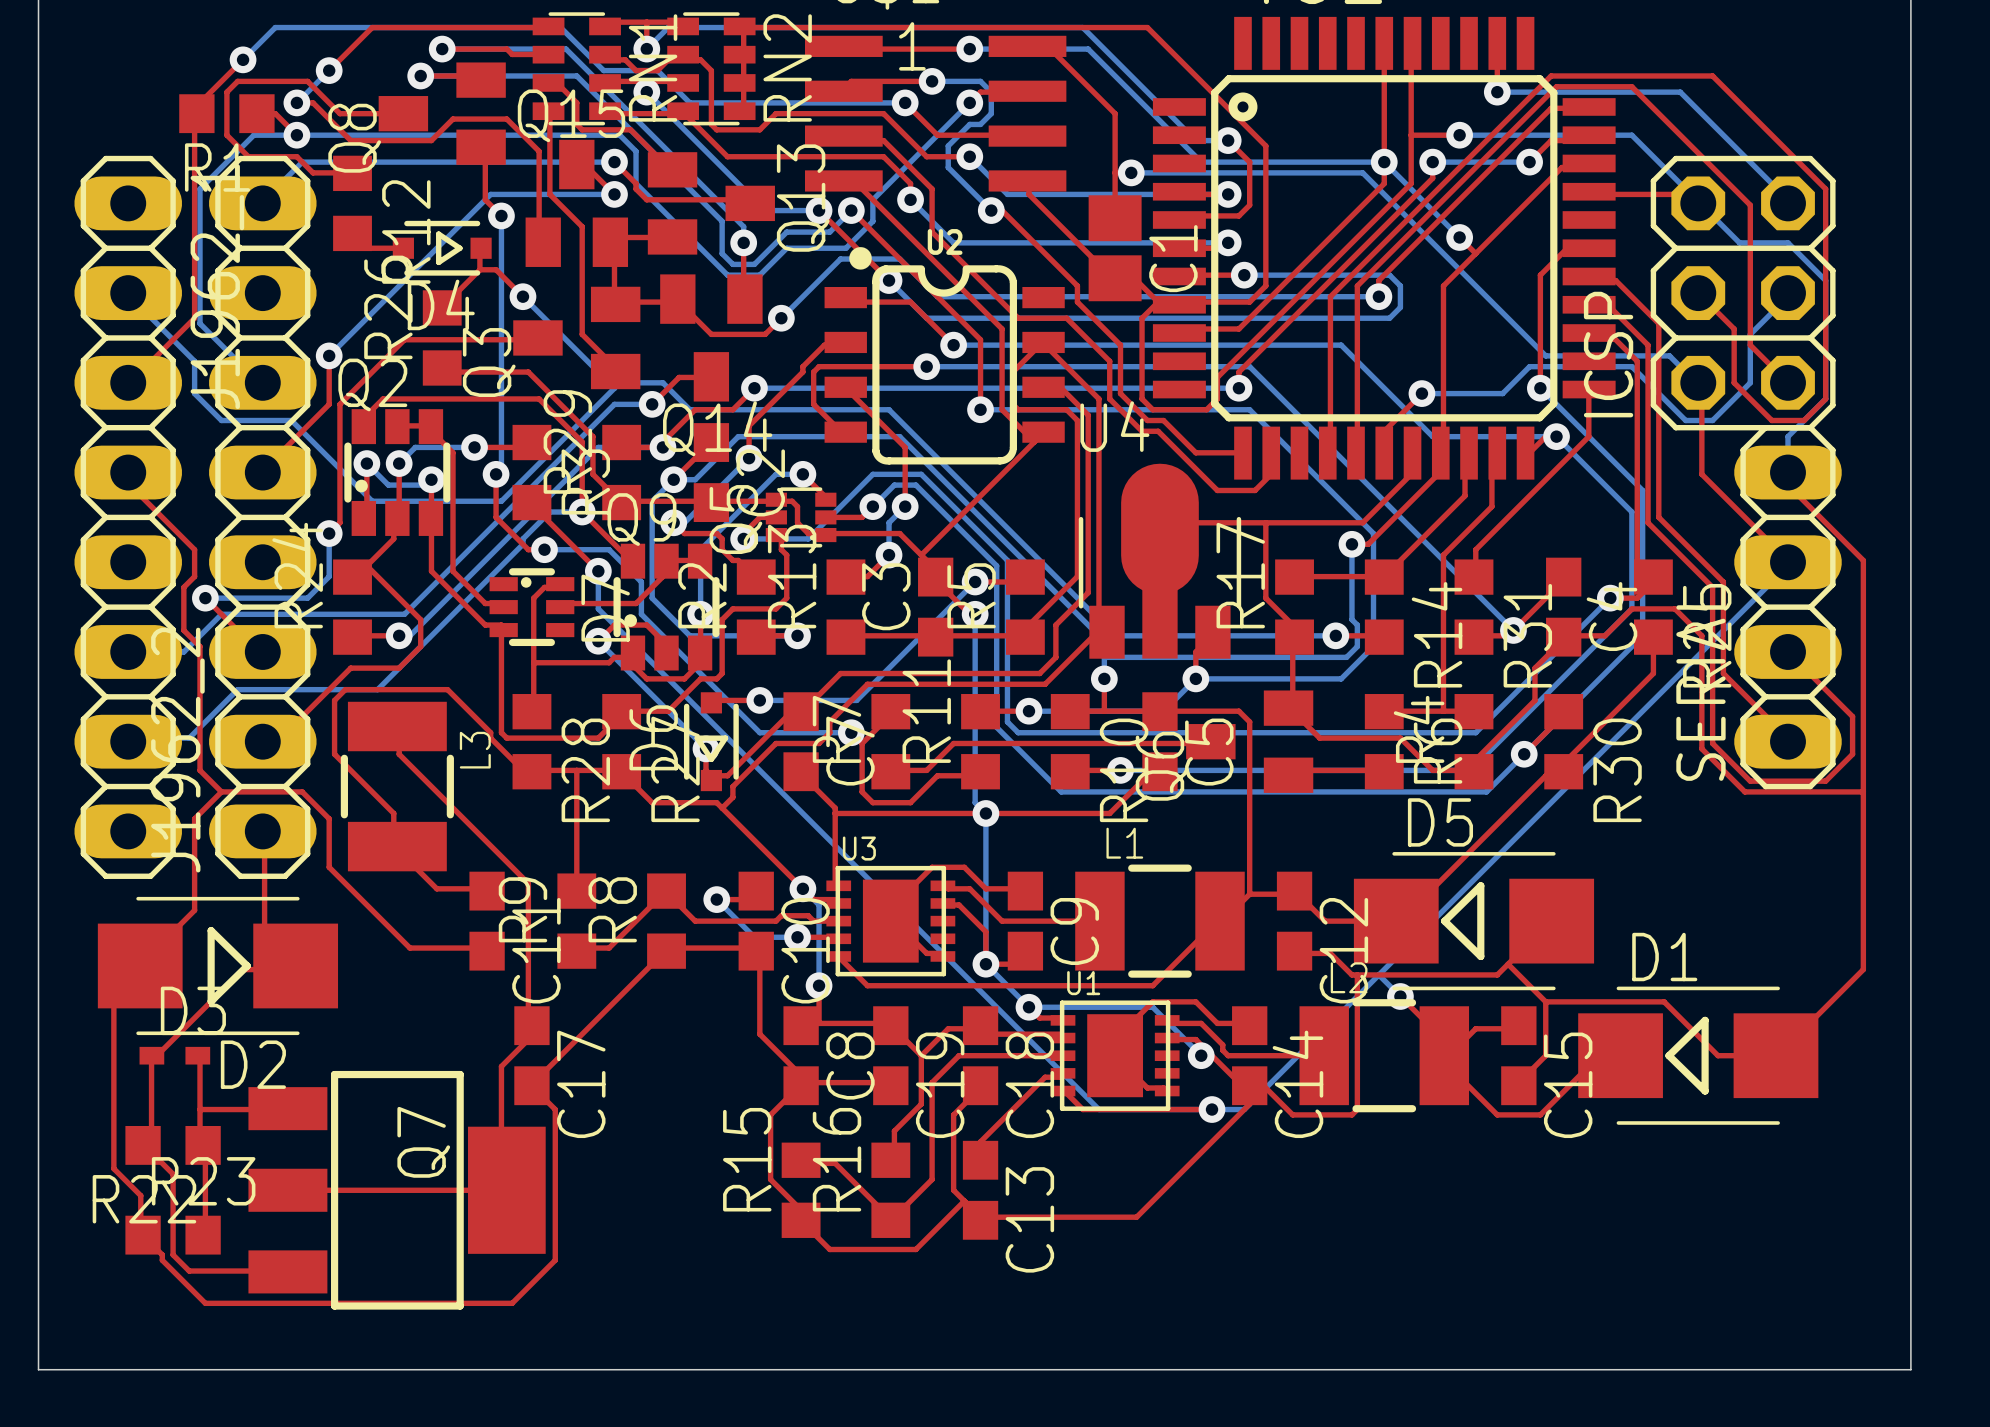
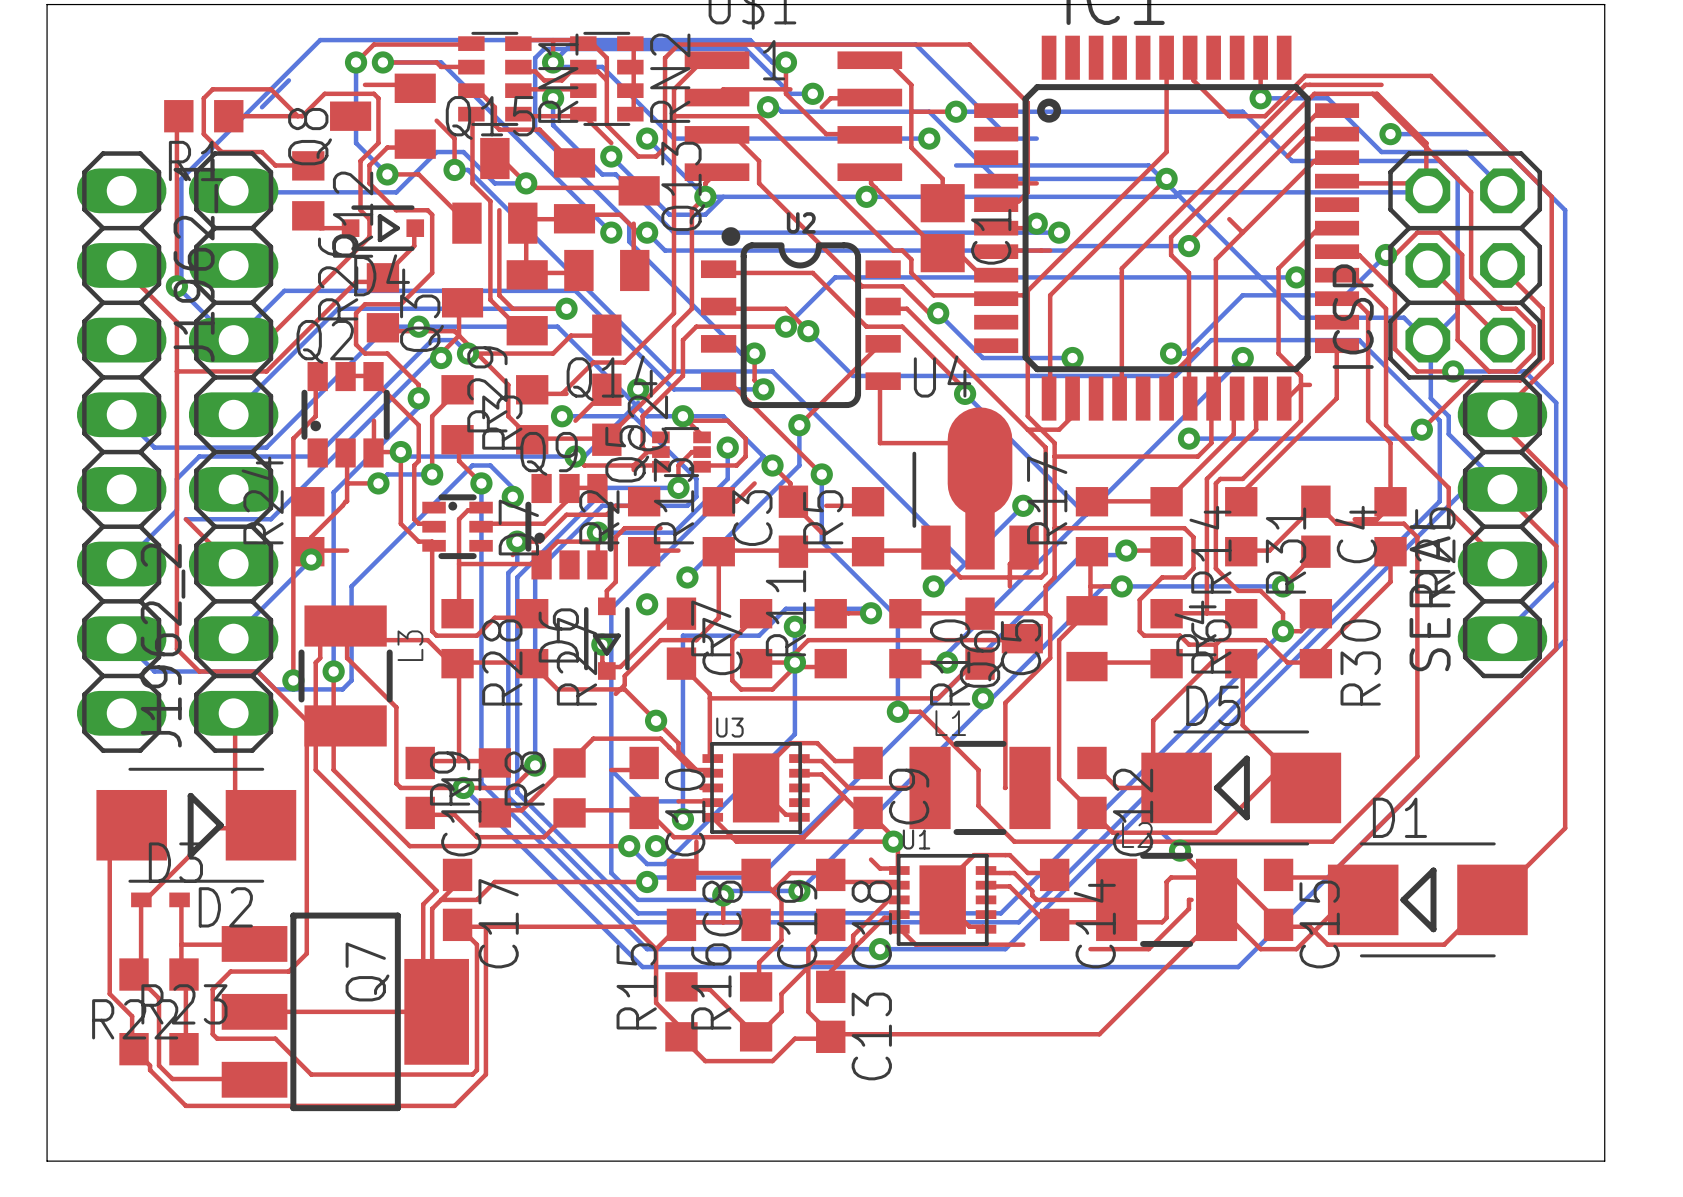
top track: none -> (583, 43) (593, 44) (606, 57) (606, 80)
top track: (431, 27) (372, 27) (329, 70) -> (373, 44) (356, 62)
top track: (743, 27) (797, 27) -> (911, 111) (956, 111)
top track: (1412, 43) (1411, 183) (1217, 377) -> (1027, 290) (1027, 335)
top track: (843, 46) (845, 49) (969, 49) -> (717, 60) (714, 62) (700, 62) (674, 89) (674, 313) (642, 344)
bottom track: none -> (356, 62) (356, 143) (387, 174)
bottom track: (512, 49) (566, 49) (743, 226) (743, 242) -> (441, 62) (611, 232)
via: none -> (785, 62)
bottom track: (969, 49) (1088, 49) (1201, 162) (1384, 162) (1459, 237) -> none
via: (969, 49) -> none
bottom track: none -> (553, 66) (602, 66) (674, 138) (929, 138)
top track: (243, 59) (200, 102) (200, 113) (196, 113) -> none
bottom track: (243, 59) (275, 27) (560, 27) (603, 70) (657, 70) (689, 102) (905, 102) -> none
via: (243, 59) -> none
via: (329, 70) -> none
bottom track: (420, 75) (576, 75) (722, 221) (722, 253) (732, 264) (754, 264) (786, 232) -> none
via position: (420, 75) -> (356, 62)
top track: (1077, 75) (1115, 113) (1115, 189) -> (911, 84) (911, 147) (942, 178)
top track: (1642, 75) (1712, 75) -> (1190, 57) (1193, 57) (1193, 80) (1229, 116) (1265, 116) (1305, 75) (1430, 75) (1439, 84)
bottom track: (932, 81) (980, 81) (991, 92) (991, 113) (980, 124) (969, 124) (948, 145) (948, 167) (991, 210) -> none
via: (932, 81) -> none
bottom track: none -> (553, 93) (553, 125) (602, 174) (615, 174) (674, 232) (1059, 232)
bottom track: none -> (812, 93) (790, 93) (745, 49) (544, 49) (535, 57) (535, 129) (629, 223) (629, 241) (741, 353) (754, 353)
top track: (1561, 86) (1556, 86) (1357, 285) (1357, 431) -> (1314, 93) (1171, 237) (1171, 255) (1188, 272) (1190, 398)
top track: none -> (1372, 93) (1377, 93) (1426, 143) (1426, 187)
bottom track: (646, 92) (716, 162) -> none
bottom track: none -> (768, 98) (781, 111) (929, 111) (996, 178) (1166, 178)
bottom track: (1578, 92) (1680, 92) (1744, 156) -> (1327, 98) (1381, 152) (1466, 152)
top track: (1217, 97) (1265, 145) (1265, 285) (1249, 302) (1179, 302) (1179, 304) (1158, 302) (1142, 318) (1142, 398) (1152, 409) (1206, 409) (1217, 398) -> (1045, 613) (1045, 586) (1054, 577) (1054, 443) (1027, 416) (1027, 353)
top track: (296, 102) (313, 102) (350, 140) (431, 140) (453, 119) (506, 119) -> none
via: (296, 102) -> none
top track: (905, 102) (937, 135) (975, 135) -> (785, 62) (785, 93) (826, 134)
bottom track: (969, 102) (872, 199) (872, 221) (845, 248) (786, 248) (759, 275) (727, 275) (636, 183) (636, 151) (619, 135) (253, 135) -> (785, 62) (772, 62) (750, 40) (320, 40) (226, 134)
via position: (969, 102) -> (812, 93)
bottom track: none -> (956, 111) (1242, 111) (1291, 160) (1439, 160) (1457, 178) (1457, 313) (1430, 340) (1430, 398) (1448, 416) (1448, 434) (1502, 487) (1484, 469) (1005, 949) (647, 949) (481, 783) (481, 483)
via: none -> (956, 111)
top track: (1567, 108) (1551, 108) (1378, 280) (1378, 296) -> (1318, 111) (1188, 241) (1188, 246)
top track: (275, 113) (296, 135) -> (244, 116) (297, 116)
top track: (345, 113) (399, 113) -> (302, 116) (324, 93) (373, 93) (378, 98) (378, 143) (360, 160) (360, 210) (369, 219) (369, 237) (266, 340) (233, 340)
top track: (792, 113) (775, 113) (759, 129) (716, 129) -> (678, 44) (665, 57) (665, 147) (656, 156) (638, 156) (611, 129)
top track: (883, 113) (926, 156) (969, 156) -> none
via: (296, 135) -> none
top track: (1411, 135) (1459, 135) -> none
bottom track: (1459, 135) (1631, 135) (1739, 242) (1787, 242) (1825, 280) (1825, 398) (1787, 436) (1787, 472) -> none
via: (1459, 135) -> none
bottom track: none -> (1390, 134) (1489, 134) (1565, 210) (1565, 640) (1238, 967) (642, 967) (463, 787)
via: none -> (1390, 134)
top track: (528, 140) (539, 151) (539, 237) -> (454, 138) (454, 169)
bottom track: none -> (647, 138) (705, 196) (1175, 196) (1180, 192) (1427, 190)
via: none -> (647, 138)
top track: (867, 140) (883, 140) (932, 189) (932, 232) -> (759, 160) (759, 183) (790, 214)
via: none -> (929, 138)
top track: (1228, 140) (1249, 162) (1249, 205) (1238, 215) (1206, 215) -> (1027, 102) (1027, 192) (1018, 201)
via: (1228, 140) -> none
top track: (716, 145) (727, 156) (883, 156) -> (736, 138) (750, 152)
top track: (481, 147) (485, 151) (485, 199) (501, 215) -> (415, 144) (414, 147) (387, 147) (369, 165) (369, 183) (396, 210) (427, 210) (432, 214) (432, 272) (400, 304)
bottom track: (969, 156) (1007, 194) (1228, 194) -> none
via: (969, 156) -> none
top track: (1384, 156) (1384, 183) (1238, 328) (1212, 328) -> (1166, 152) (1023, 295)
top track: (614, 162) (636, 183) (636, 189) (646, 199) -> (526, 183) (530, 187) (553, 187)
bottom track: (614, 162) (302, 162) (262, 203) -> (494, 183) (463, 152) (436, 152) (396, 192) (233, 190)
via: (614, 162) -> none
via: none -> (611, 156)
via position: (1384, 162) -> (1166, 178)
top track: (1432, 162) (1432, 178) (1238, 372) (1238, 388) -> none
bottom track: (1432, 162) (1529, 162) -> none
via: (1432, 162) -> none
via: (1529, 162) -> none
top track: (894, 167) (910, 183) (910, 199) -> none
via: (1131, 172) -> none
bottom track: none -> (454, 169) (468, 169) (669, 371) (772, 371) (965, 564)
via: none -> (454, 169)
top track: (843, 180) (845, 183) (856, 183) (1002, 328) (1002, 409) (1034, 442) (1043, 432) -> (717, 172) (705, 183) (705, 196) (691, 210) (691, 308) (674, 326) (674, 371) (606, 438)
top track: none -> (387, 174) (418, 174) (463, 219)
via: none -> (387, 174)
top track: (1825, 189) (1825, 366) -> (1533, 178) (1551, 196) (1551, 362) (1502, 411) (1502, 414)
bottom track: (576, 194) (490, 194) (329, 355) -> none
via: (1228, 194) -> none
bottom track: (910, 199) (953, 242) (1228, 242) -> none
via: (910, 199) -> none
bottom track: (765, 210) (819, 210) -> (651, 196) (669, 214)
top track: (819, 210) (889, 280) -> none
via: (819, 210) -> none
via: none -> (705, 196)
top track: (851, 210) (980, 339) (980, 409) -> none
via: (851, 210) -> none
top track: (991, 210) (1002, 210) (1066, 275) -> (750, 116) (759, 116) (893, 250) (902, 250)
via position: (991, 210) -> (866, 196)
bottom track: (501, 215) (501, 468) (496, 474) -> none
via: (501, 215) -> none
top track: (571, 215) (582, 226) -> (490, 201) (490, 299) (517, 326) (526, 326)
top track: none -> (574, 218) (575, 214) (620, 214) (638, 232) (647, 232)
via: (1459, 237) -> none
via position: (743, 242) -> (647, 232)
via: none -> (611, 232)
bottom track: none -> (647, 232) (665, 250) (1050, 250)
top track: (479, 269) (496, 269) (522, 296) -> none
via: none -> (1188, 246)
via position: (1244, 275) -> (1059, 232)
bottom track: (1265, 275) (1389, 275) (1400, 285) (1400, 307) (1389, 318) (926, 318) (889, 280) -> (1068, 250) (1072, 246) (1188, 246)
top track: (1540, 275) (1540, 388) -> (1296, 250) (1278, 268) (1278, 353) (1300, 375) (1300, 420)
via: (889, 280) -> none
top track: none -> (1386, 255) (1394, 255) (1417, 232) (1439, 232) (1462, 255) (1462, 299) (1471, 308)
bottom track: none -> (1386, 255) (1345, 295) (1242, 295) (1184, 353) (1171, 353)
via: none -> (1386, 255)
bottom track: (128, 293) (194, 361) (194, 393) (221, 420) (291, 420) (372, 501) (501, 501) (619, 382) (662, 382) (689, 409) (889, 409) (1115, 635) (1335, 635) -> none
top track: none -> (1502, 265) (1502, 268) (1542, 308) (1542, 358) (1520, 380) (1471, 380) (1421, 429)
bottom track: (1787, 293) (1787, 296) (1750, 334) (1750, 382) (1712, 420) (1685, 420) (1631, 366) (1529, 366) (1502, 393) (1421, 393) -> none
bottom track: (522, 296) (614, 388) -> none
via: (522, 296) -> none
bottom track: (1378, 296) (937, 296) (899, 259) (840, 259) (781, 318) -> none
via: (1378, 296) -> none
top track: (677, 299) (711, 334) (765, 334) (781, 318) -> none
top track: (910, 302) (953, 345) -> (772, 272) (812, 272) (866, 326) (902, 326)
top track: none -> (382, 277) (382, 281) (356, 281) (266, 371) (176, 371)
bottom track: none -> (1296, 277) (835, 277) (785, 326) (777, 326)
via: none -> (1296, 277)
top track: (1750, 307) (1750, 345) -> (1471, 277) (1502, 308) (1515, 308) (1533, 326)
top track: (194, 318) (128, 382) -> none
via: none -> (176, 286)
via: (781, 318) -> none
top track: (582, 328) (582, 334) (614, 366) -> (499, 295) (512, 308) (566, 308)
top track: (1104, 328) (1120, 345) (1120, 393) -> (933, 295) (991, 295) (996, 298)
top track: (420, 339) (404, 339) (339, 404) (339, 522) (329, 533) -> none
top track: (463, 339) (533, 339) -> (441, 358) (441, 353) (459, 335) (459, 304)
top track: (845, 342) (840, 345) (824, 345) (802, 366) (802, 372) (749, 425) (749, 458) -> (718, 306) (718, 308) (785, 308) (808, 331)
top track: (1043, 342) (1012, 372) (1012, 404) (1018, 409) (1066, 409) (1077, 420) (1077, 576) (1028, 625) (1028, 635) -> none
bottom track: none -> (566, 308) (338, 308) (233, 414)
via: none -> (566, 308)
bottom track: (953, 345) (1341, 345) (1432, 436) (1556, 436) (1631, 512) (1631, 608) (1470, 770) (1120, 770) -> none
via: (953, 345) -> none
top track: (1045, 345) (1066, 366) -> (884, 308) (906, 308) (947, 349)
top track: (1098, 350) (1109, 361) (1109, 398) (1142, 431) (1158, 431) -> (969, 371) (978, 380)
bottom track: none -> (938, 313) (983, 358) (1072, 358)
via: none -> (938, 313)
top track: (1626, 350) (1637, 361) (1637, 560) (1653, 576) -> (1368, 313) (1368, 420) (1390, 443) (1390, 501)
top track: (329, 355) (329, 404) (262, 472) -> none
via: (329, 355) -> none
via: none -> (418, 326)
bottom track: (926, 366) (1249, 366) (1513, 630) -> none
top track: (813, 372) (813, 404) (840, 431) (845, 432) -> (691, 331) (682, 340) (682, 375) (642, 416) (642, 447) (647, 452)
bottom track: none -> (808, 331) (853, 375) (1175, 375) (1211, 340) (1359, 340) (1439, 420) (1439, 501) (1018, 922) (633, 922) (508, 796) (508, 572) (517, 564) (517, 541)
via: none -> (808, 331)
top track: (679, 377) (652, 404) -> (579, 335) (571, 335) (553, 353) (468, 353)
bottom track: none -> (233, 340) (284, 290) (575, 290) (674, 389) (763, 389)
top track: (1698, 382) (1701, 382) (1701, 474) (1787, 562) -> none
top track: (845, 387) (889, 431) -> (754, 353) (754, 380)
top track: (1043, 387) (1061, 388) (1088, 415) (1088, 592) (1055, 625) (1055, 657) (1039, 673) (840, 673) (808, 705) -> (883, 343) (880, 344) (799, 425)
bottom track: (754, 388) (1238, 388) -> none
via: (754, 388) -> none
via position: (1238, 388) -> (1072, 358)
bottom track: (1540, 388) (1642, 490) (1642, 635) (1486, 791) (1061, 791) (996, 727) (996, 565) (915, 485) (894, 485) (872, 506) -> none
via: (1540, 388) -> none
via: (1421, 393) -> none
top track: (1658, 393) (1658, 517) (1723, 582) -> (1386, 425) (1448, 487) (1448, 505)
top track: none -> (1394, 349) (1417, 371) (1453, 371)
top track: (420, 398) (383, 398) (366, 415) (366, 425) (363, 426) -> (365, 353) (356, 344) (356, 313) (365, 304)
top track: (447, 398) (539, 398) (582, 442) (582, 512) (630, 560) -> (387, 353) (418, 384) (418, 398)
via: none -> (468, 353)
via: none -> (754, 353)
top track: (1098, 398) (1098, 625) (1107, 632) -> (929, 353) (965, 389) (965, 393)
via: none -> (1171, 353)
via: none -> (441, 358)
bottom track: (652, 404) (614, 404) (404, 614) (221, 614) (183, 651) (130, 651) -> (468, 353) (454, 340) (432, 340) (315, 456) (199, 456) (176, 478) (176, 510) (123, 564)
via: (652, 404) -> none
bottom track: none -> (1242, 358) (938, 662)
via: none -> (1242, 358)
bottom track: (980, 409) (1249, 409) (1373, 533) (1373, 646) (1341, 678) -> (1283, 586) (1130, 586)
via: (980, 409) -> none
top track: (1147, 420) (1163, 420) (1195, 452) (1242, 453) -> (1166, 178) (1050, 295) (1049, 398)
bottom track: none -> (1453, 371) (1524, 371) (1556, 402) (1556, 581) (1502, 635) (1502, 638)
via: none -> (1453, 371)
top track: none -> (317, 376) (315, 380) (315, 416) (293, 438) (293, 604)
top track: none -> (718, 381) (718, 384) (732, 384) (821, 474)
top track: (1039, 436) (921, 555) -> none
via: (1556, 436) -> none
top track: (1588, 436) (1545, 479) -> (1336, 384) (1336, 398) (1242, 492)
top track: (899, 442) (905, 447) (905, 506) -> none
via: none -> (763, 389)
top track: (474, 447) (528, 447) -> (432, 474) (432, 416) (454, 393)
bottom track: (474, 447) (415, 447) (399, 463) -> none
via: (474, 447) -> none
bottom track: (662, 447) (598, 447) (409, 635) (399, 635) -> none
via: (662, 447) -> none
bottom track: none -> (965, 393) (1085, 514)
via: none -> (965, 393)
top track: (453, 452) (453, 571) (479, 598) -> (391, 398) (418, 425) (418, 461) (414, 465) (414, 519)
bottom track: none -> (418, 398) (418, 407) (333, 492) (333, 671)
via: none -> (418, 398)
top track: (1412, 453) (1411, 474) (1362, 522) -> none
via position: (749, 458) -> (638, 389)
top track: (366, 463) (366, 506) -> none
bottom track: (366, 463) (388, 485) (426, 485) (431, 479) -> none
via: (366, 463) -> none
top track: (399, 463) (399, 517) (393, 522) (393, 538) (356, 576) (352, 577) (366, 565) (420, 619) (420, 646) (399, 668) (350, 668) (280, 738) (264, 738) (262, 741) -> none
via: (399, 463) -> none
top track: (128, 472) (130, 474) (130, 485) (194, 549) -> (121, 265) (176, 322) (176, 478)
top track: (496, 474) (496, 517) (528, 549) (544, 549) -> none
via: (496, 474) -> none
bottom track: none -> (562, 416) (633, 416) (696, 478) (696, 496) (687, 505) (602, 505) (535, 572) (535, 765)
bottom track: (775, 474) (700, 549) (700, 614) -> (660, 416) (647, 416) (557, 326) (387, 326) (266, 447) (154, 447) (121, 414)
top track: none -> (678, 416) (678, 420) (727, 420) (745, 438) (745, 456) (736, 465)
bottom track: none -> (682, 416) (723, 416) (772, 465)
top track: (1438, 474) (1368, 544) (1351, 544) -> (1211, 416) (1211, 443) (1197, 456) (1148, 456)
via: (431, 479) -> none
via position: (673, 479) -> (562, 416)
bottom track: none -> (799, 425) (799, 465) (687, 577)
via: none -> (799, 425)
top track: (1648, 485) (1648, 522) (1712, 587) (1712, 743) (1750, 781) (1825, 781) -> (1336, 877) (1336, 868) (1533, 671)
top track: none -> (1027, 429) (1045, 447) (1045, 572) (1041, 577) (960, 577) (933, 550)
top track: (1491, 490) (1491, 506) (1448, 549) -> (1256, 429) (1206, 478) (1206, 613)
bottom track: none -> (1421, 429) (1412, 438) (1188, 438)
via: none -> (1421, 429)
top track: (711, 501) (775, 501) (776, 499) (792, 501) (797, 506) (797, 522) (808, 533) (825, 535) -> none
via: none -> (1188, 438)
top track: (533, 506) (598, 571) -> (459, 443) (459, 461) (481, 483)
top track: (872, 506) (862, 517) (825, 517) -> (678, 487) (678, 465) (691, 452) (702, 452)
via position: (872, 506) -> (727, 447)
bottom track: (905, 506) (889, 522) (889, 555) -> none
via: (905, 506) -> none
bottom track: (582, 512) (549, 512) (522, 538) (522, 544) (377, 689) (237, 689) (189, 738) (130, 738) (128, 741) -> (512, 487) (490, 465) (472, 465) (351, 586) (351, 680) (342, 689) (275, 689) (257, 671) (154, 671) (121, 638)
via: (582, 512) -> none
bottom track: none -> (727, 447) (727, 478) (674, 532) (602, 532)
bottom track: none -> (400, 452) (405, 456) (566, 456)
via: none -> (400, 452)
top track: none -> (345, 452) (347, 501) (311, 537) (311, 559)
top track: (430, 518) (431, 571) (463, 603) -> (373, 452) (400, 452) (400, 523)
top track: (1249, 522) (1168, 522) (1159, 529) -> (880, 384) (880, 443) (960, 443) (980, 461)
top track: (1265, 522) (1265, 598) (1292, 625) (1292, 635) (1294, 637) -> none
bottom track: (329, 533) (329, 576) -> (441, 358) (432, 358) (288, 501)
via: (329, 533) -> none
top track: (716, 533) (722, 538) (722, 549) (732, 560) (738, 560) (756, 577) -> (611, 465) (660, 466)
top track: (867, 533) (899, 533) (932, 565) -> (772, 465) (790, 483) (790, 492)
top track: (776, 535) (781, 538) (781, 549) (786, 555) (786, 598) (775, 608) -> none
bottom track: (743, 538) (808, 538) (872, 474) (921, 474) (1007, 560) (1007, 721) (1018, 732) (1475, 732) (1610, 598) -> none
via: (743, 538) -> none
bottom track: none -> (432, 474) (387, 474) (378, 483)
via: none -> (432, 474)
bottom track: none -> (821, 474) (821, 541) (897, 617) (897, 711)
via: none -> (821, 474)
bottom track: (1351, 544) (1351, 619) (1357, 625) (1357, 646) (1346, 657) (1104, 657) -> none
via: (1351, 544) -> none
bottom track: (544, 549) (609, 549) (641, 582) (641, 614) (759, 732) (851, 732) -> none
via position: (544, 549) -> (481, 483)
top track: (1475, 549) (1475, 565) -> (1242, 478) (1220, 478)
top track: none -> (347, 483) (378, 483)
via: none -> (378, 483)
via position: (889, 555) -> (772, 465)
bottom track: none -> (678, 487) (606, 487) (517, 577) (517, 792) (638, 913) (1000, 913) (1283, 631)
via: none -> (678, 487)
bottom track: (1787, 562) (1787, 565) (1244, 1109) (1098, 1109) (598, 608) (598, 571) -> none
top track: (194, 576) (183, 587) (183, 630) (200, 646) (200, 770) (221, 791) -> (176, 501) (176, 649) (199, 671) (257, 671) (266, 680)
bottom track: (975, 582) (856, 700) (759, 700) -> none
via: (975, 582) -> none
bottom track: none -> (1023, 505) (942, 586)
via: none -> (1023, 505)
top track: (1723, 587) (1723, 673) (1787, 738) (1787, 741) -> (1448, 510) (1502, 564)
via: (205, 598) -> none
via: (1610, 598) -> none
top track: (1674, 608) (1631, 608) (1604, 635) (1563, 637) -> (1408, 528) (1403, 523) (1336, 523) (1315, 501)
bottom track: (975, 614) (975, 802) (985, 813) (985, 964) (1028, 1007) (1152, 1007) (1201, 1055) -> none
via: (975, 614) -> none
top track: (1685, 619) (1701, 635) (1701, 748) (1744, 791) (1863, 791) -> (1417, 537) (1417, 756) (1332, 841) (1014, 841) (978, 805) (978, 770) (920, 711) (897, 711)
top track: (630, 625) (646, 625) (662, 641) (662, 651) (666, 653) -> (539, 541) (566, 514) (606, 514) (615, 505) (642, 505) (644, 501)
top track: none -> (602, 541) (557, 541) (544, 555) (544, 564) (541, 564) (459, 564)
via: (1513, 630) -> none
via: (399, 635) -> none
bottom track: (797, 635) (689, 635) (652, 598) (652, 501) (673, 479) (695, 479) (738, 436) (899, 436) (1104, 641) (1104, 678) -> none
via position: (797, 635) -> (687, 577)
top track: (1093, 635) (1045, 684) (867, 684) (829, 721) (829, 732) -> (924, 550) (871, 550)
top track: none -> (718, 551) (718, 617) (705, 631)
bottom track: (598, 641) (706, 748) -> none
via position: (598, 641) -> (517, 541)
bottom track: none -> (1126, 555) (1081, 555) (759, 877) (651, 877) (647, 881)
bottom track: none -> (311, 559) (233, 638)
via: none -> (311, 559)
top track: (1787, 651) (1852, 716) -> (1502, 489) (1502, 492) (1556, 546) (1556, 617)
top track: (700, 653) (695, 657) (695, 668) (684, 678) (646, 678) (636, 668) (636, 657) (632, 653) (630, 657) (614, 657) (609, 662) (533, 662) -> none
top track: (1443, 657) (1443, 711) -> (1215, 568) (1238, 590) (1260, 590) (1283, 613) (1283, 631) (1300, 631)
top track: (1534, 668) (1534, 700) (1475, 759) (1475, 770) (1473, 771) (1432, 770) (1411, 748) -> (1215, 644) (1188, 644)
top track: (716, 678) (700, 678) (668, 711) (621, 711) -> none
top track: (1104, 678) (1104, 711) -> (723, 895) (723, 922)
via: (1195, 678) -> none
top track: none -> (1090, 586) (1121, 586)
bottom track: (1308, 678) (1195, 678) (1163, 711) (1028, 711) -> (1103, 586) (799, 890) (727, 890) (718, 899) (638, 899) (611, 873) (611, 608) (763, 456)
via: none -> (1121, 586)
via: none -> (1283, 586)
top track: (334, 700) (345, 689) (447, 689) (490, 732) (490, 738) (496, 743) -> (370, 638) (427, 640)
top track: (711, 700) (759, 700) -> (606, 604) (606, 590) (611, 586)
top track: (1288, 708) (1319, 738) (1357, 738) -> (1054, 528) (1184, 528) (1193, 537) (1193, 568) (1184, 577) (1162, 577) (1139, 599) (1139, 631) (1144, 635)
top track: none -> (1086, 610) (1059, 640) (1059, 778) (1091, 812)
top track: (619, 716) (598, 738) (555, 738) -> (530, 617) (494, 617) (476, 635)
bottom track: none -> (871, 617) (862, 608) (785, 608) (759, 635) (682, 635) (682, 819)
top track: (1244, 716) (1249, 721) (1249, 894) -> (1050, 617) (1050, 658) (1005, 702) (1005, 787)
bottom track: none -> (794, 626) (794, 734) (665, 864) (647, 864) (629, 846)
via: none -> (794, 626)
via: (851, 732) -> none
top track: (1545, 732) (1524, 754) -> none
top track: none -> (1215, 644) (1215, 658) (1153, 720) (1153, 765)
top track: (334, 754) (393, 813) (393, 845) (397, 846) (399, 851) (436, 888) (485, 888) (487, 891) -> (293, 649) (293, 680)
top track: (399, 754) (528, 883) (528, 1023) (531, 1025) -> (347, 649) (347, 658) (396, 707) (396, 783) (400, 787) (512, 787) (535, 765)
via position: (1524, 754) -> (1283, 631)
top track: (576, 770) (576, 888) -> (420, 762) (423, 761) (494, 761)
via: none -> (794, 662)
top track: none -> (457, 663) (459, 761)
top track: none -> (1241, 663) (1242, 725) (1305, 787)
top track: (1563, 771) (1561, 775) (1545, 775) (1400, 921) (1396, 921) -> (1315, 663) (1287, 662) (1265, 640) (1220, 640) (1215, 644)
top track: none -> (333, 671) (333, 770) (409, 846) (629, 846)
via: none -> (333, 671)
top track: (221, 791) (302, 791) -> none
top track: (221, 791) (194, 818) (194, 910) (140, 965) -> none
via: none -> (293, 680)
top track: (716, 802) (775, 861) -> (611, 689) (624, 689) (678, 743) (678, 752) (696, 770)
via: (985, 813) -> none
via: none -> (983, 698)
top track: (329, 818) (329, 867) (361, 899) -> (320, 638) (320, 658) (315, 662) (315, 770)
top track: none -> (288, 702) (306, 720) (306, 953) (288, 971) (230, 971) (212, 989) (212, 1034) (217, 1038) (275, 1038) (311, 1074) (472, 1074)
via: none -> (897, 711)
via: none -> (656, 720)
bottom track: (802, 888) (819, 904) (819, 985) -> none
via: (802, 888) -> none
top track: (666, 891) (695, 921) (775, 921) (781, 915) (808, 915) (813, 921) (824, 921) -> (569, 762) (593, 738) (660, 738)
top track: (1294, 891) (1292, 894) (1249, 894) -> none
via: none -> (535, 765)
top track: (1249, 894) (1222, 921) (1217, 921) (1152, 985) (1061, 985) -> none
via: (716, 899) -> none
top track: (959, 904) (985, 931) (985, 964) (1012, 964) (1025, 951) -> (812, 774) (821, 774) (857, 810) (866, 810) (897, 841) (897, 868)
via: none -> (463, 787)
top track: (1551, 921) (1497, 974) (1443, 974) -> (1305, 787) (1283, 765) (1215, 832)
via position: (797, 937) -> (682, 819)
top track: (409, 948) (485, 948) (487, 951) -> (356, 810) (436, 890) (423, 904) (423, 998) (409, 1011)
top track: (756, 951) (759, 953) (759, 1034) (797, 1071) (797, 1082) (801, 1085) -> (644, 812) (647, 810) (674, 837) (803, 837) (844, 796)
top track: (1298, 953) (1330, 953) (1351, 974) -> (1094, 814) (1112, 832) (1139, 832)
via: (985, 964) -> none
top track: (1508, 964) (1545, 1001) -> none
top track: (1357, 974) (1357, 1109) (1351, 1114) -> (1191, 899) (1188, 899) (1188, 908) (1148, 949) (1139, 949)
top track: (636, 980) (531, 1085) -> (544, 837) (476, 837) (454, 814) (423, 814) (420, 812)
via: (819, 985) -> none
via: none -> (629, 846)
via: none -> (656, 846)
top track: (1545, 1001) (1664, 1001) (1718, 1055) (1771, 1055) -> (1278, 924) (1278, 926) (1309, 926) (1327, 944) (1444, 944) (1489, 899)
top track: (1545, 1001) (1545, 1055) (1518, 1082) -> (1054, 922) (1162, 922) (1166, 917) (1166, 881) (1171, 877) (1233, 877) (1278, 922)
via position: (1028, 1007) -> (893, 841)
top track: none -> (830, 874) (830, 873) (790, 873) (772, 890)
top track: (980, 1028) (948, 1028) (921, 1055) -> none
top track: (1518, 1028) (1475, 1028) (1448, 1055) -> (1278, 877) (1336, 877)
top track: none -> (647, 881) (494, 881) (476, 899) (441, 899)
via: none -> (647, 881)
via: none -> (799, 890)
via: none -> (723, 895)
top track: (1050, 1055) (959, 1055) (932, 1082) (932, 1179) (921, 1190) -> (888, 899) (853, 935) (853, 944) (835, 962) (812, 962) (781, 993) (781, 1011)
via: (1201, 1055) -> none
top track: (1249, 1085) (1249, 1104) (1136, 1217) -> (1215, 877) (1215, 917) (1099, 1034) (960, 1034)
top track: none -> (459, 926) (633, 926) (656, 949)
top track: (1249, 1088) (1265, 1088) (1292, 1114) -> none
via: (1212, 1109) -> none
via: none -> (880, 949)
top track: (980, 1220) (964, 1201) (915, 1249) (910, 1249) -> (830, 1036) (830, 1038) (794, 1038) (772, 1061)
top track: (549, 1265) (512, 1303) -> (485, 926) (485, 1074) (454, 1105) (441, 1105)

